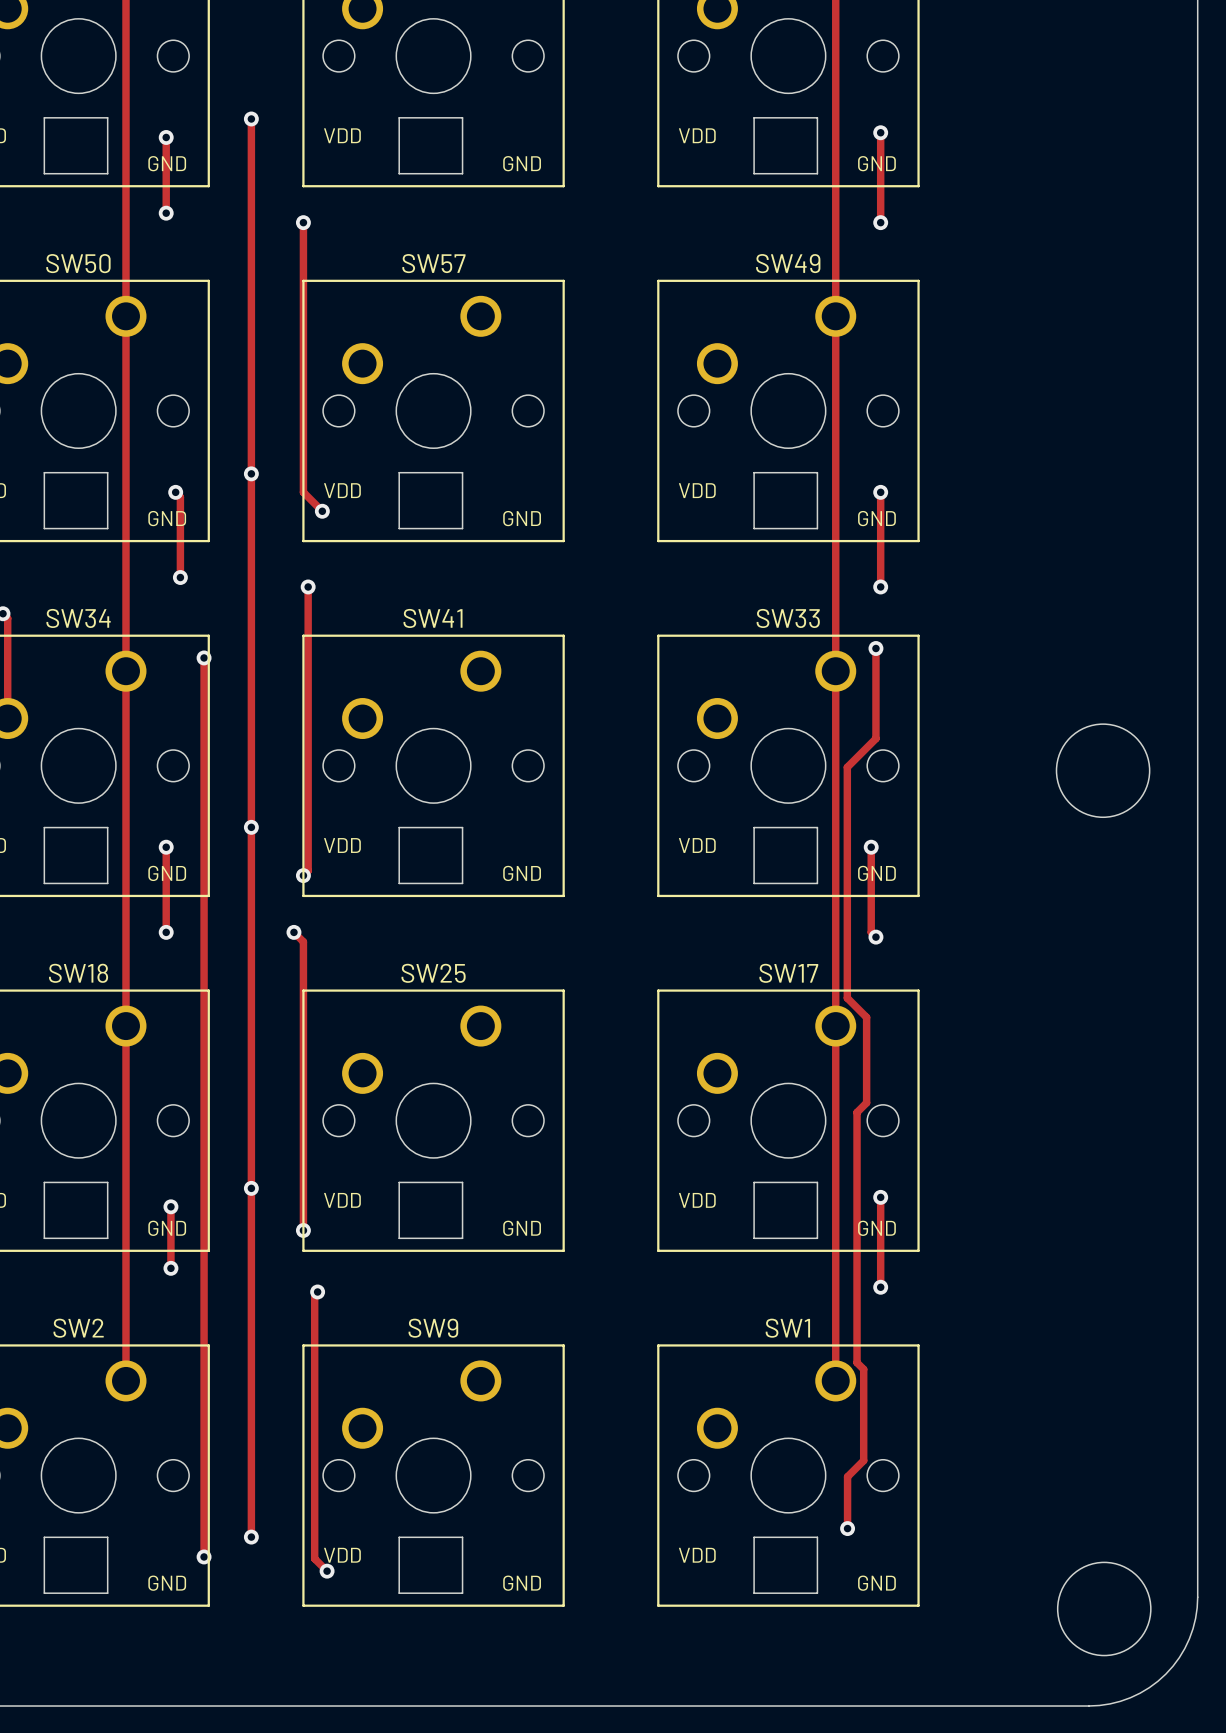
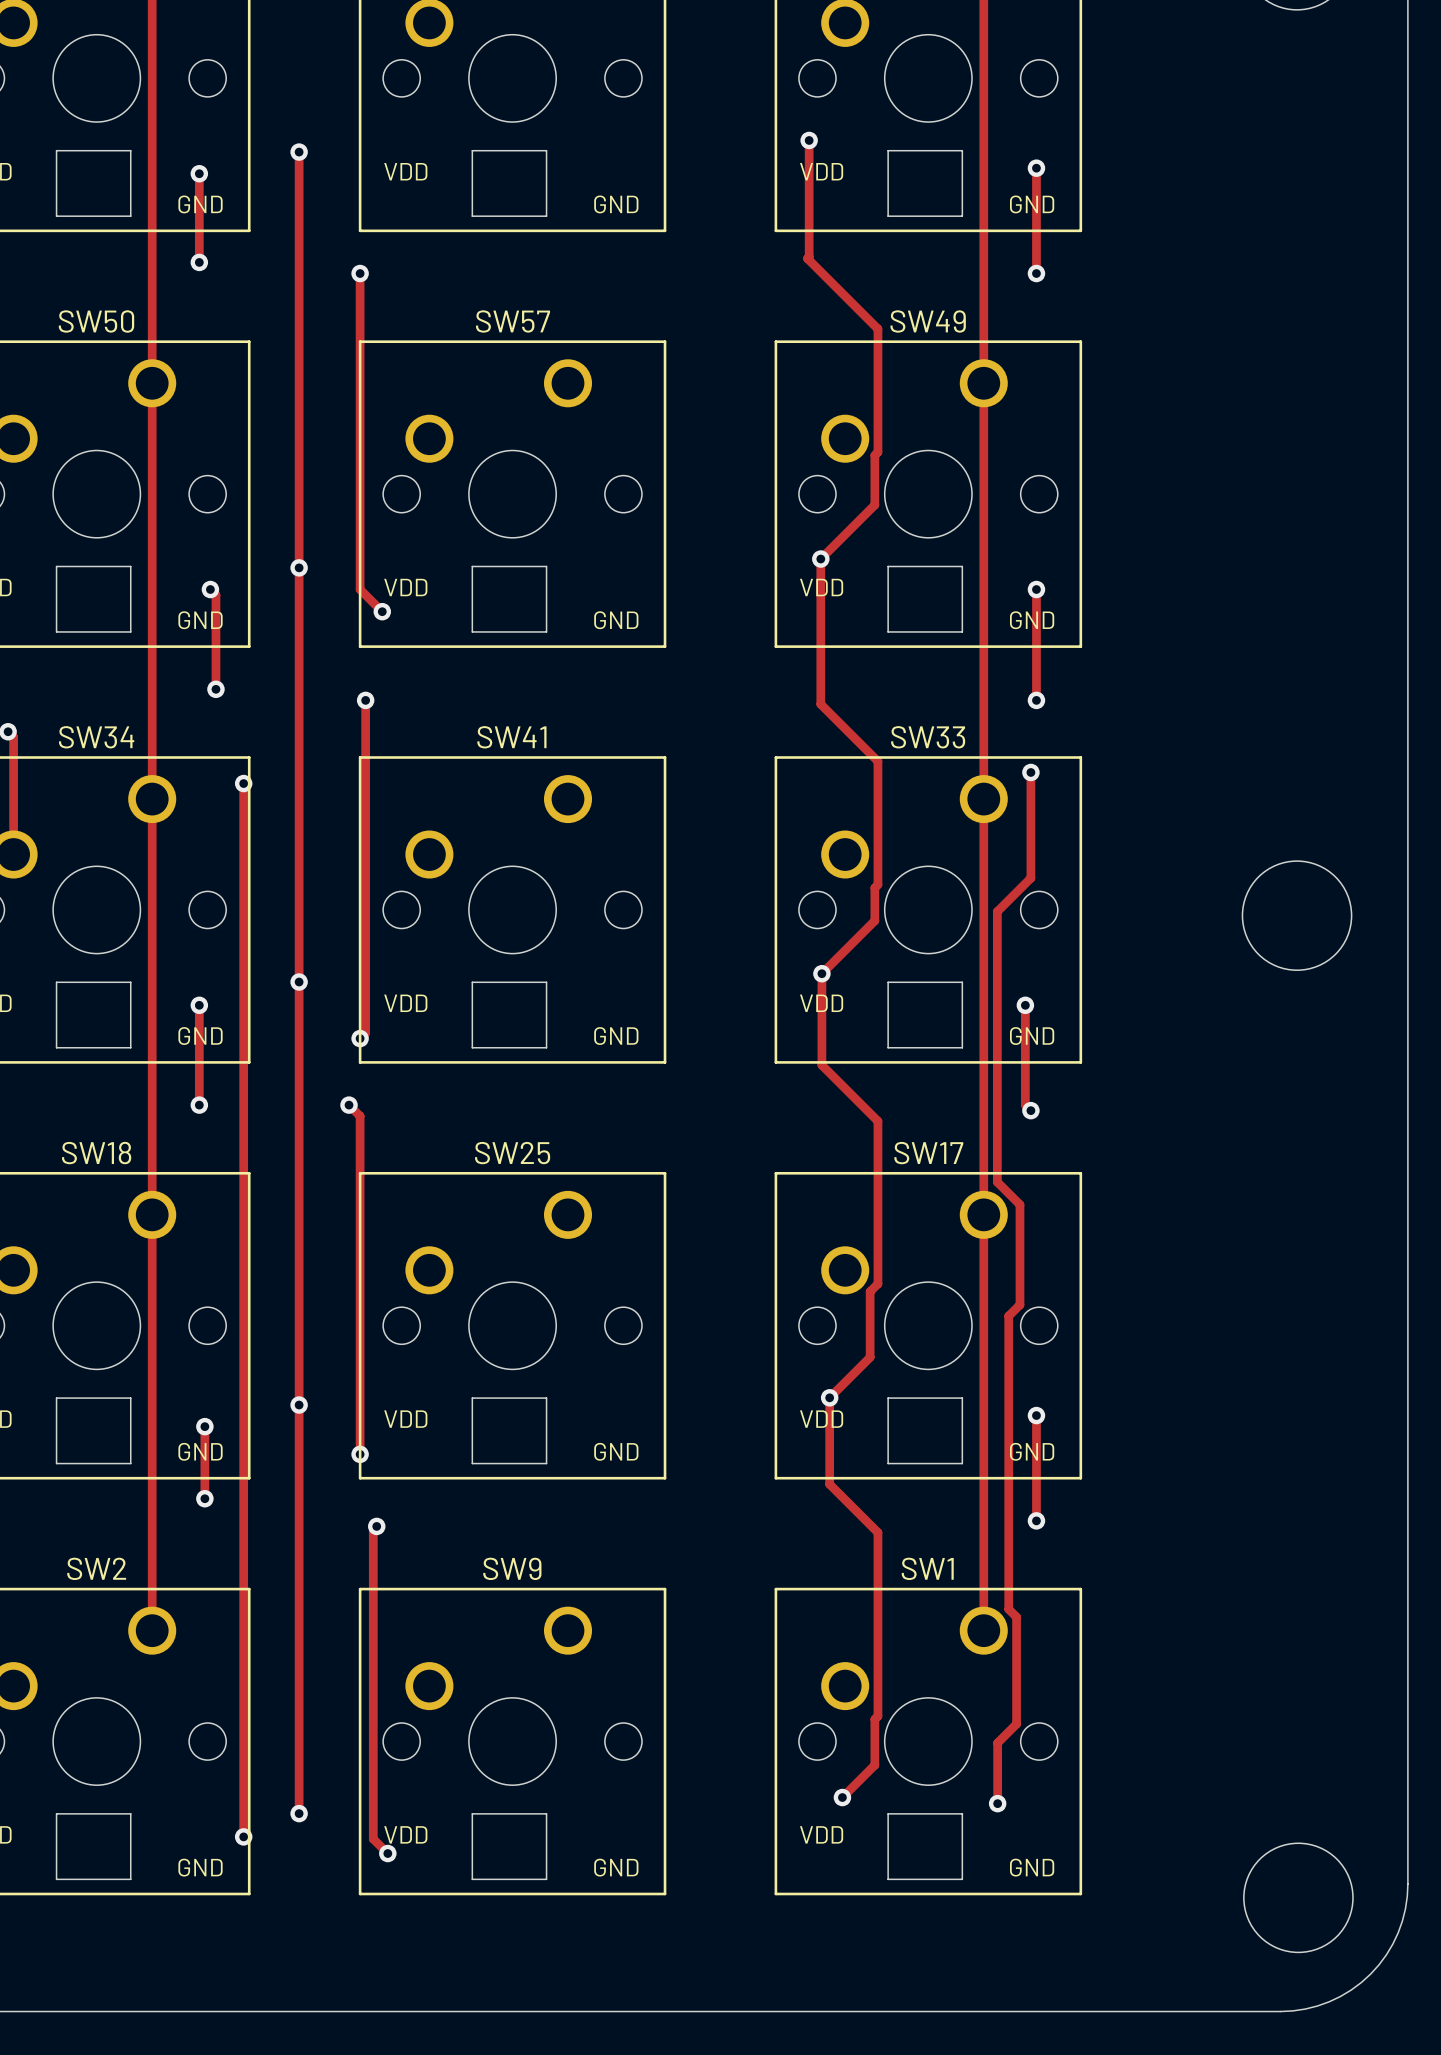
track: none -> (809, 140) (809, 256) (807, 258) (877, 329) (877, 452) (874, 455) (874, 504) (820, 559) (820, 704) (877, 761) (877, 884) (874, 887) (874, 920) (821, 973) (821, 1065) (877, 1121) (877, 1283) (870, 1291) (870, 1357) (829, 1397) (829, 1484) (877, 1532) (877, 1716) (874, 1719) (874, 1765) (842, 1797)
via: none -> (809, 140)
via: none -> (820, 559)
via: none -> (821, 973)
via: none -> (829, 1397)
via: none -> (842, 1797)

